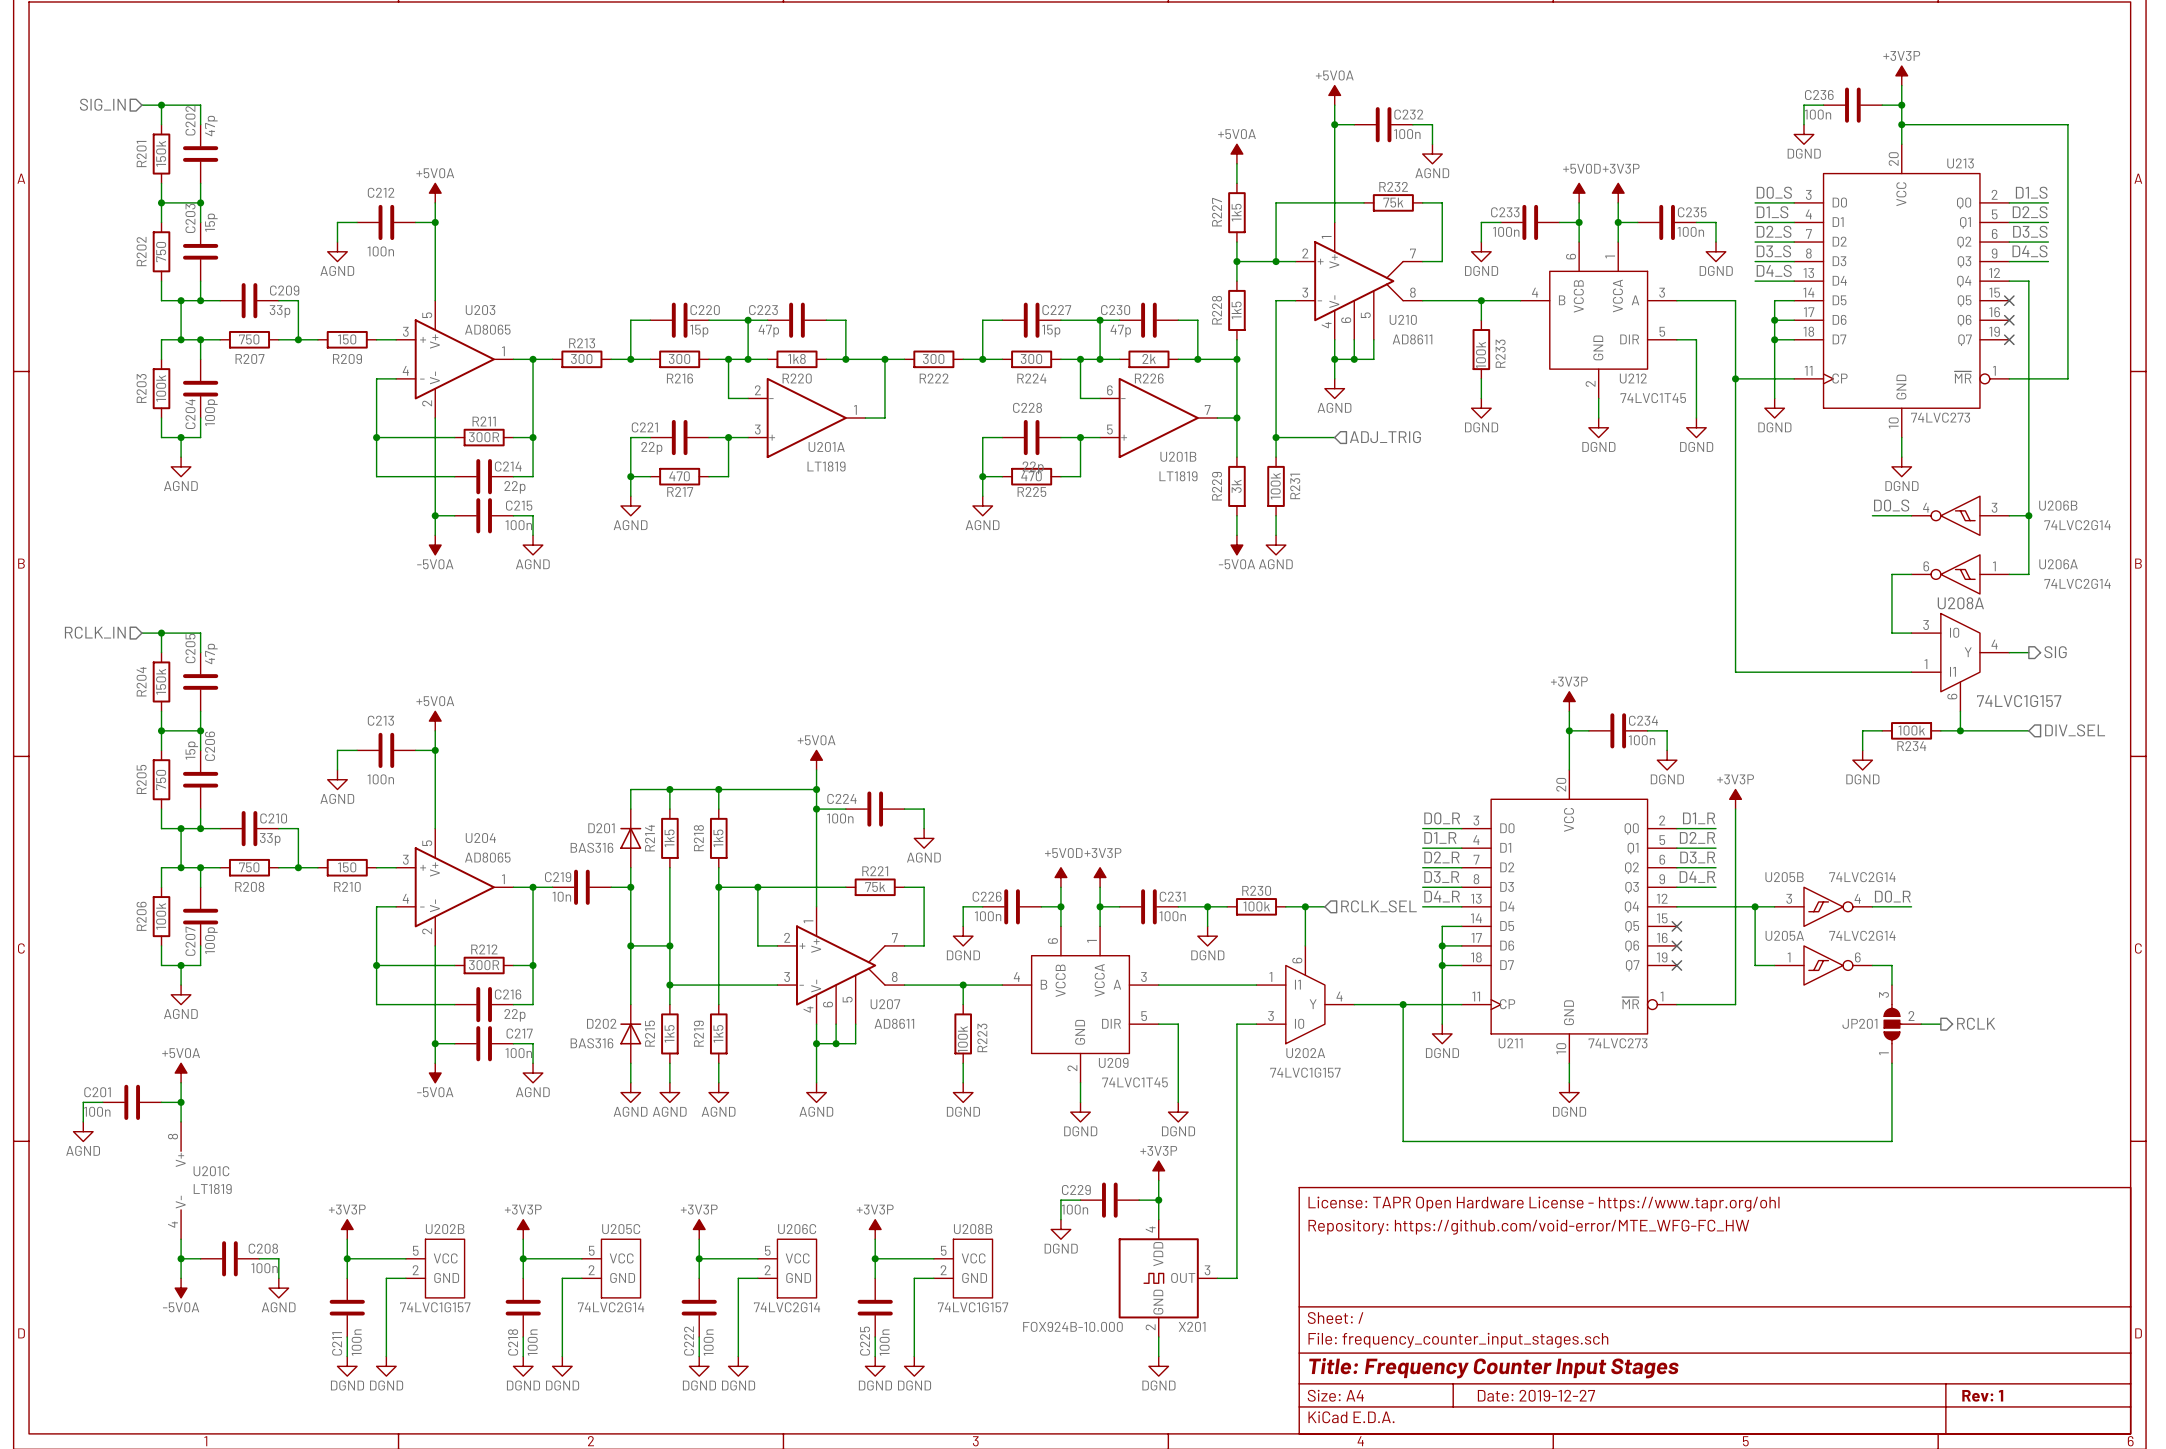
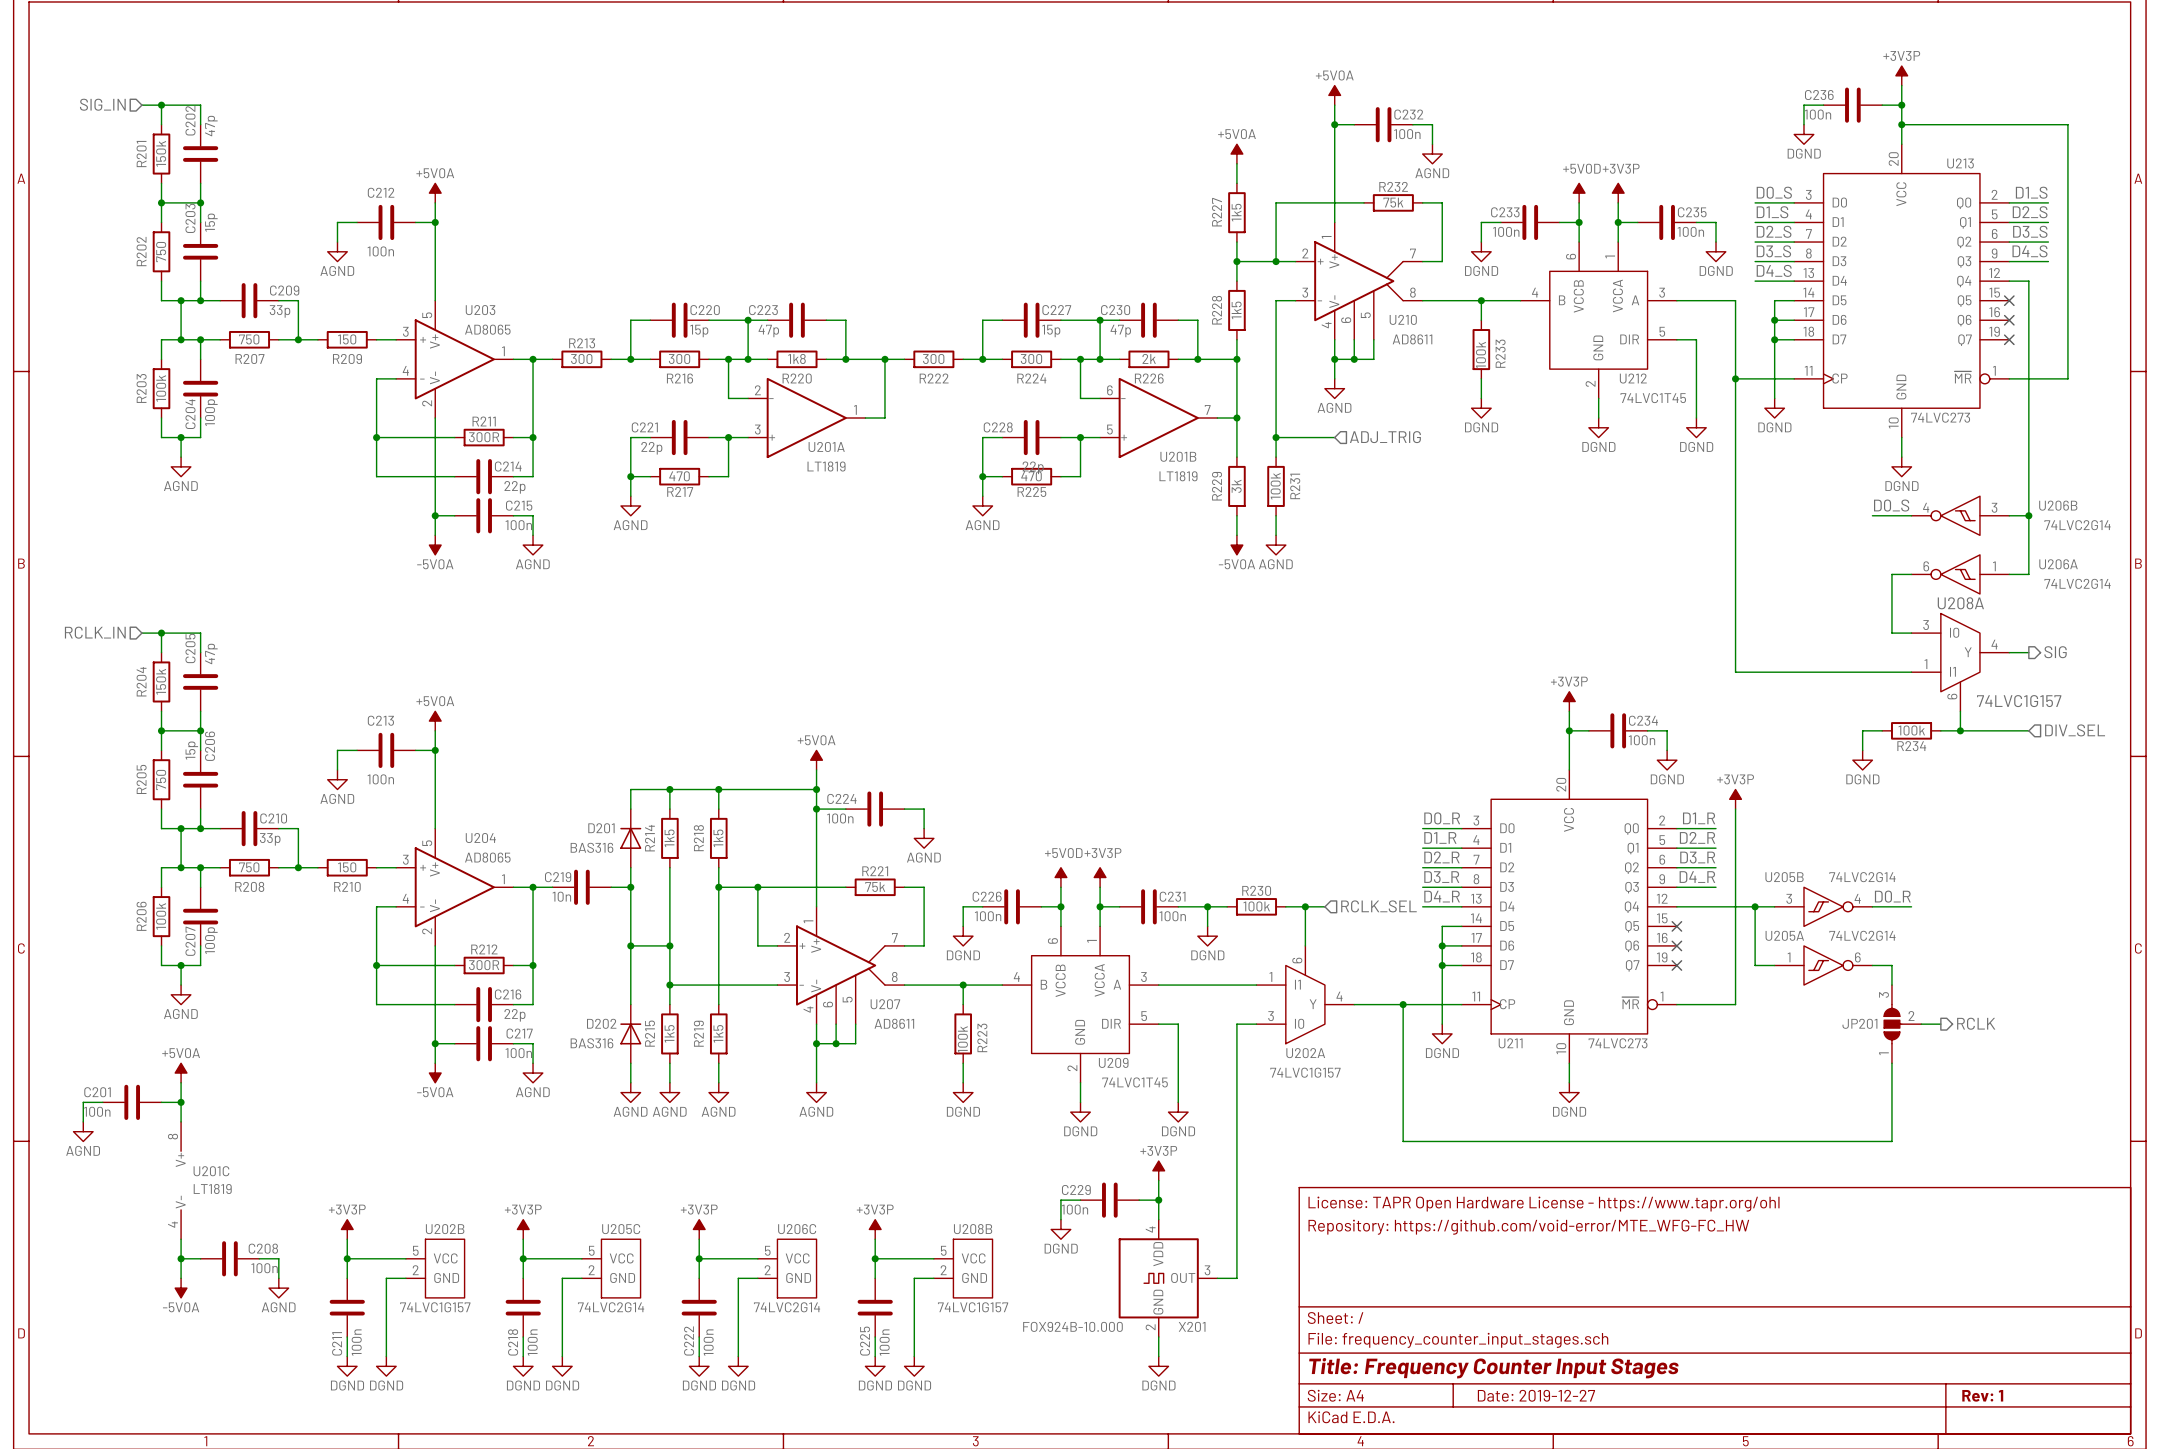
C228 name position: C228 (1027, 407) -> C228 (998, 427)

